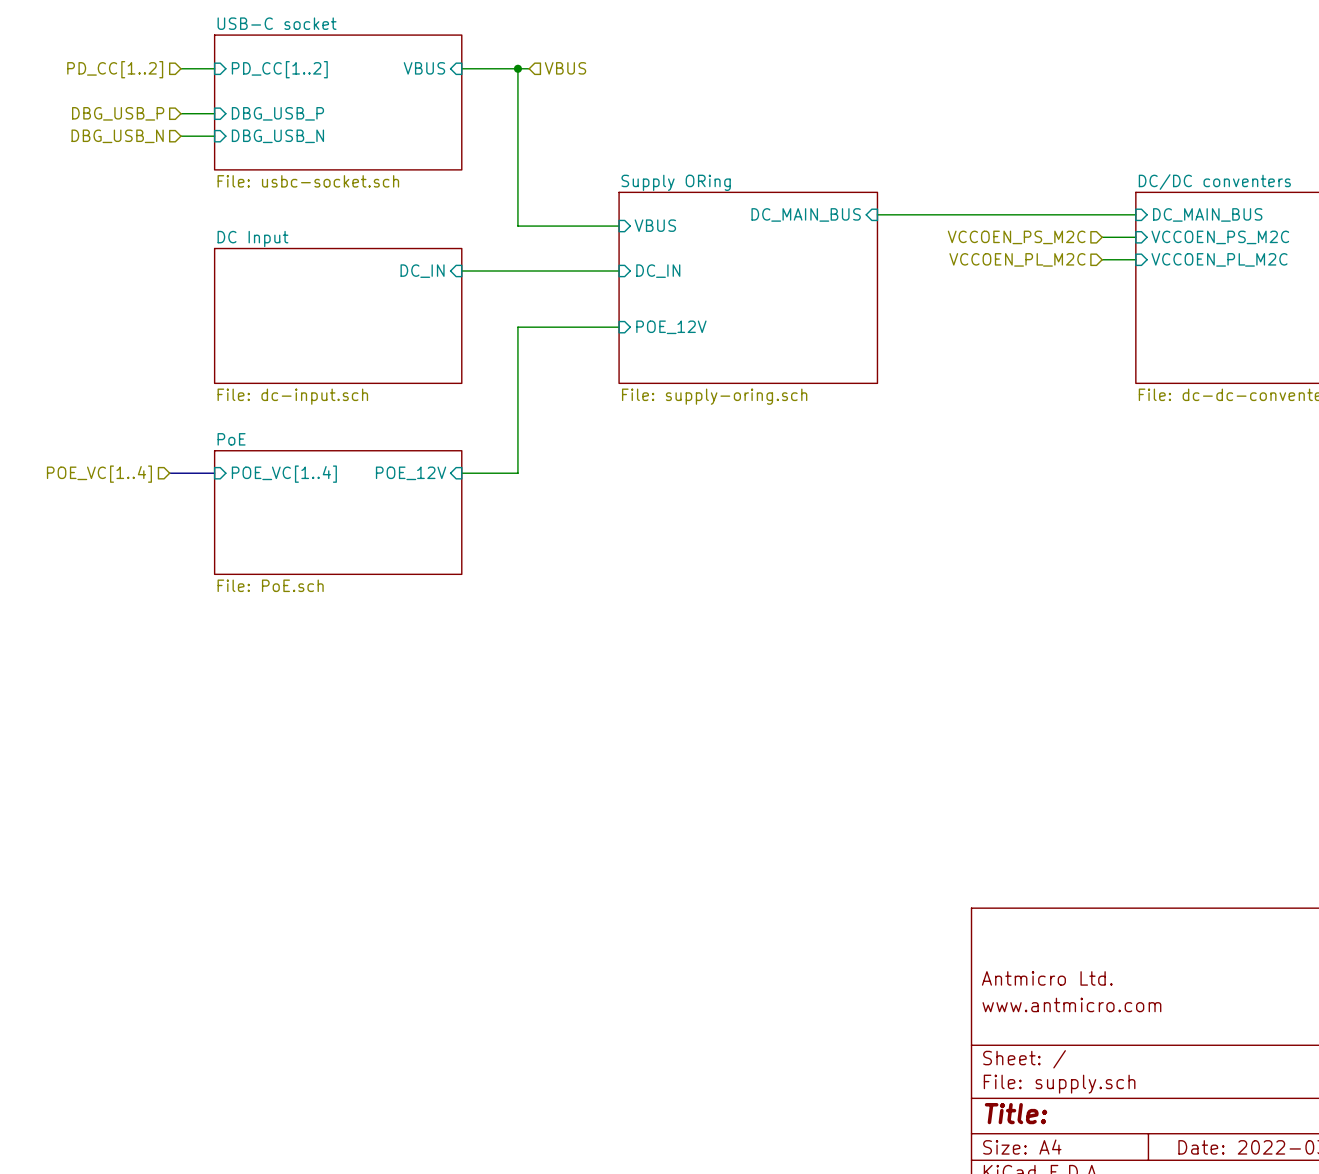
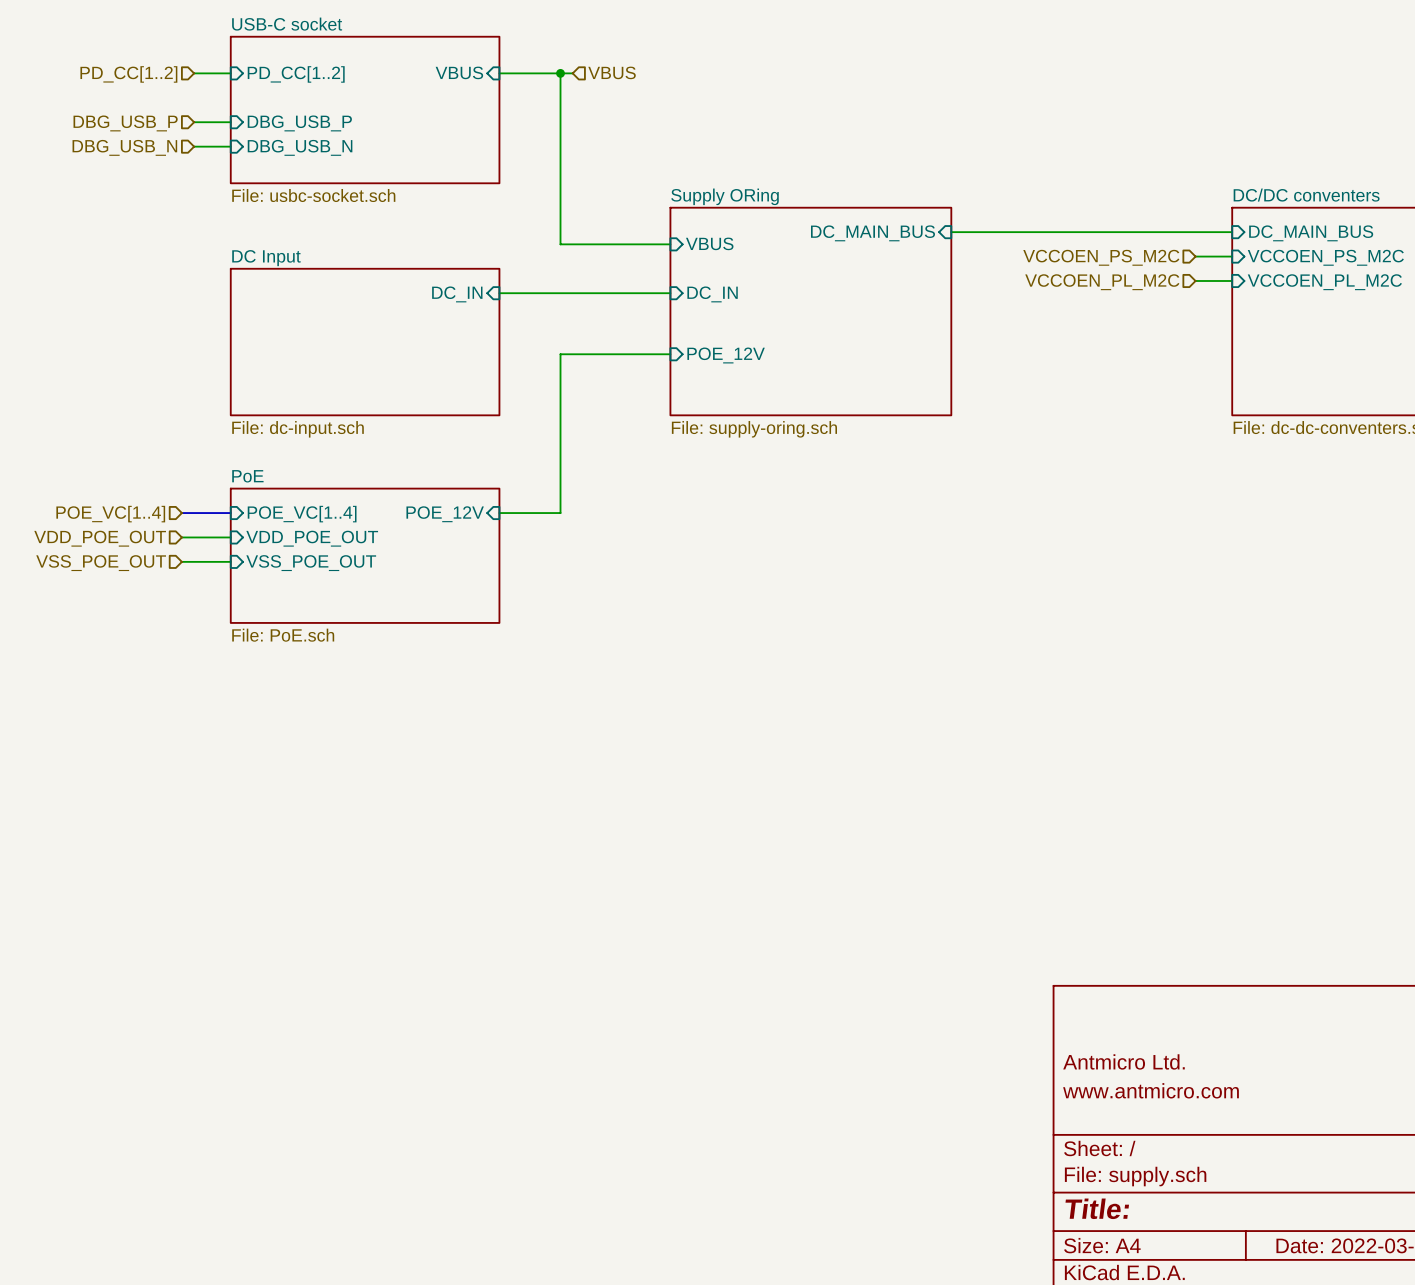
hierarchical label: none -> VDD_POE_OUT (100, 538)
wire: none -> (181, 537) (230, 537)
sheet pin: none -> VDD_POE_OUT (312, 538)
hierarchical label: none -> VSS_POE_OUT (101, 563)
wire: none -> (181, 561) (230, 561)
sheet pin: none -> VSS_POE_OUT (311, 563)

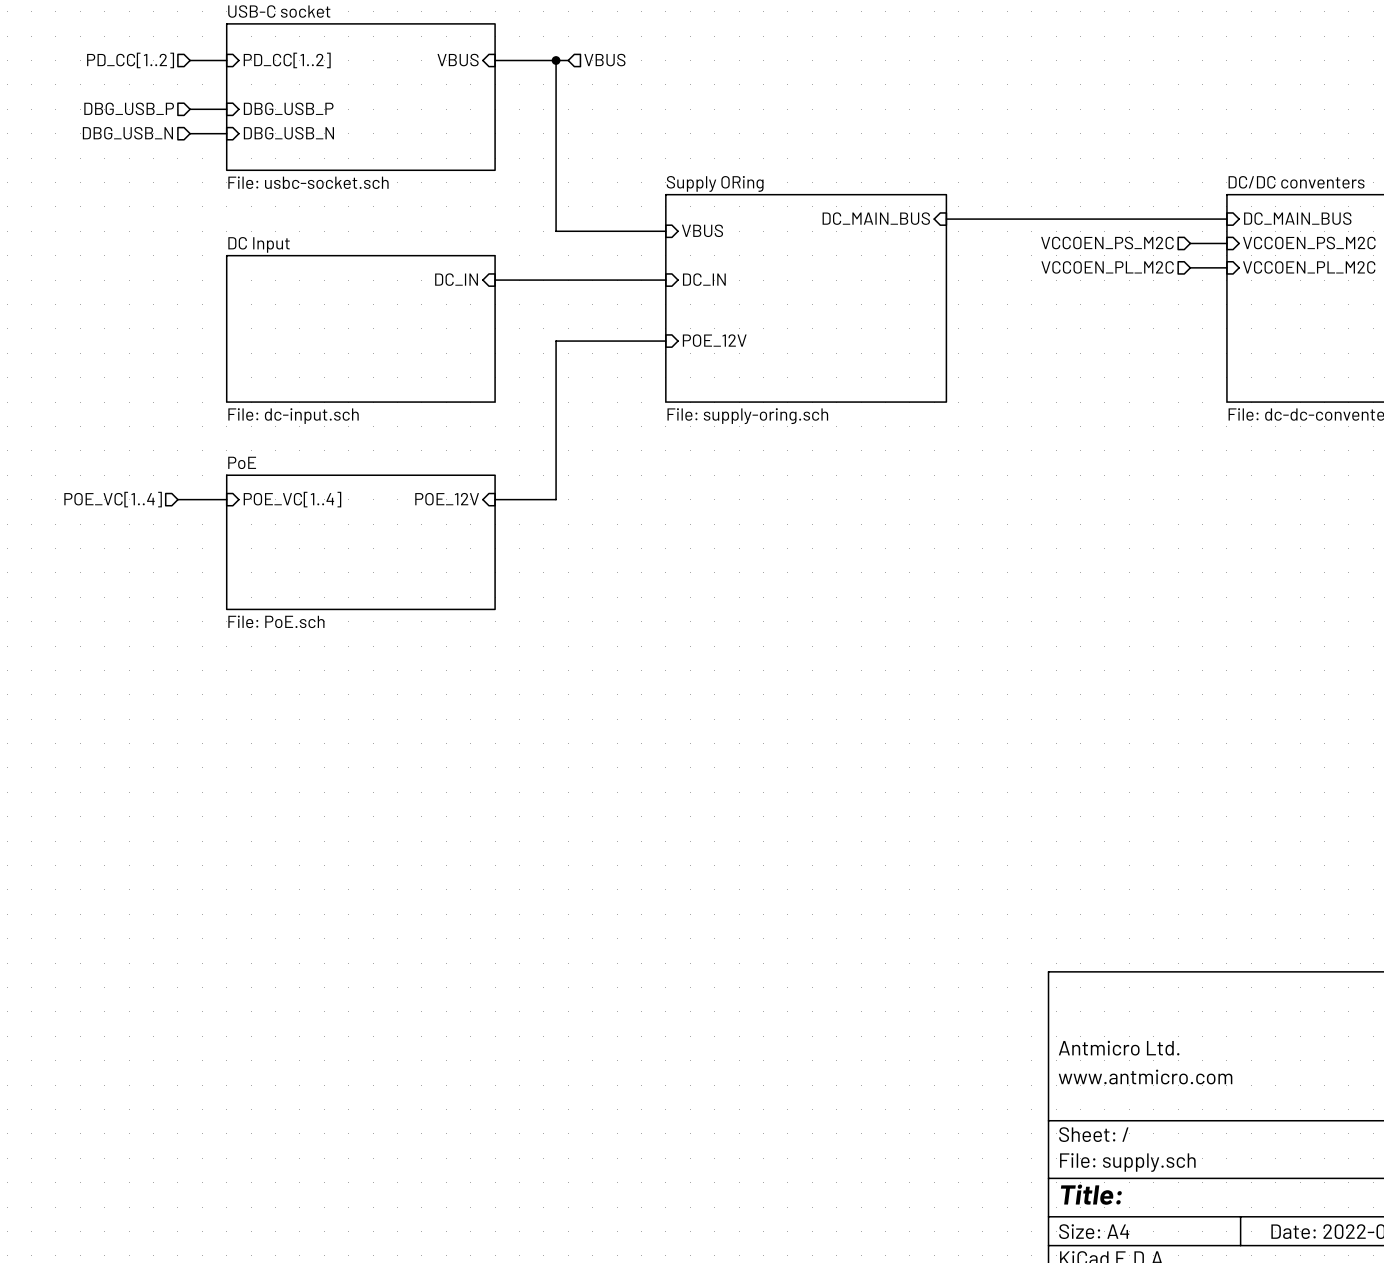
wire: (181, 537) (230, 537) -> none
hierarchical label: VDD_POE_OUT (100, 538) -> none
sheet pin: VDD_POE_OUT (312, 538) -> none
wire: (181, 561) (230, 561) -> none
hierarchical label: VSS_POE_OUT (101, 563) -> none
sheet pin: VSS_POE_OUT (311, 563) -> none

